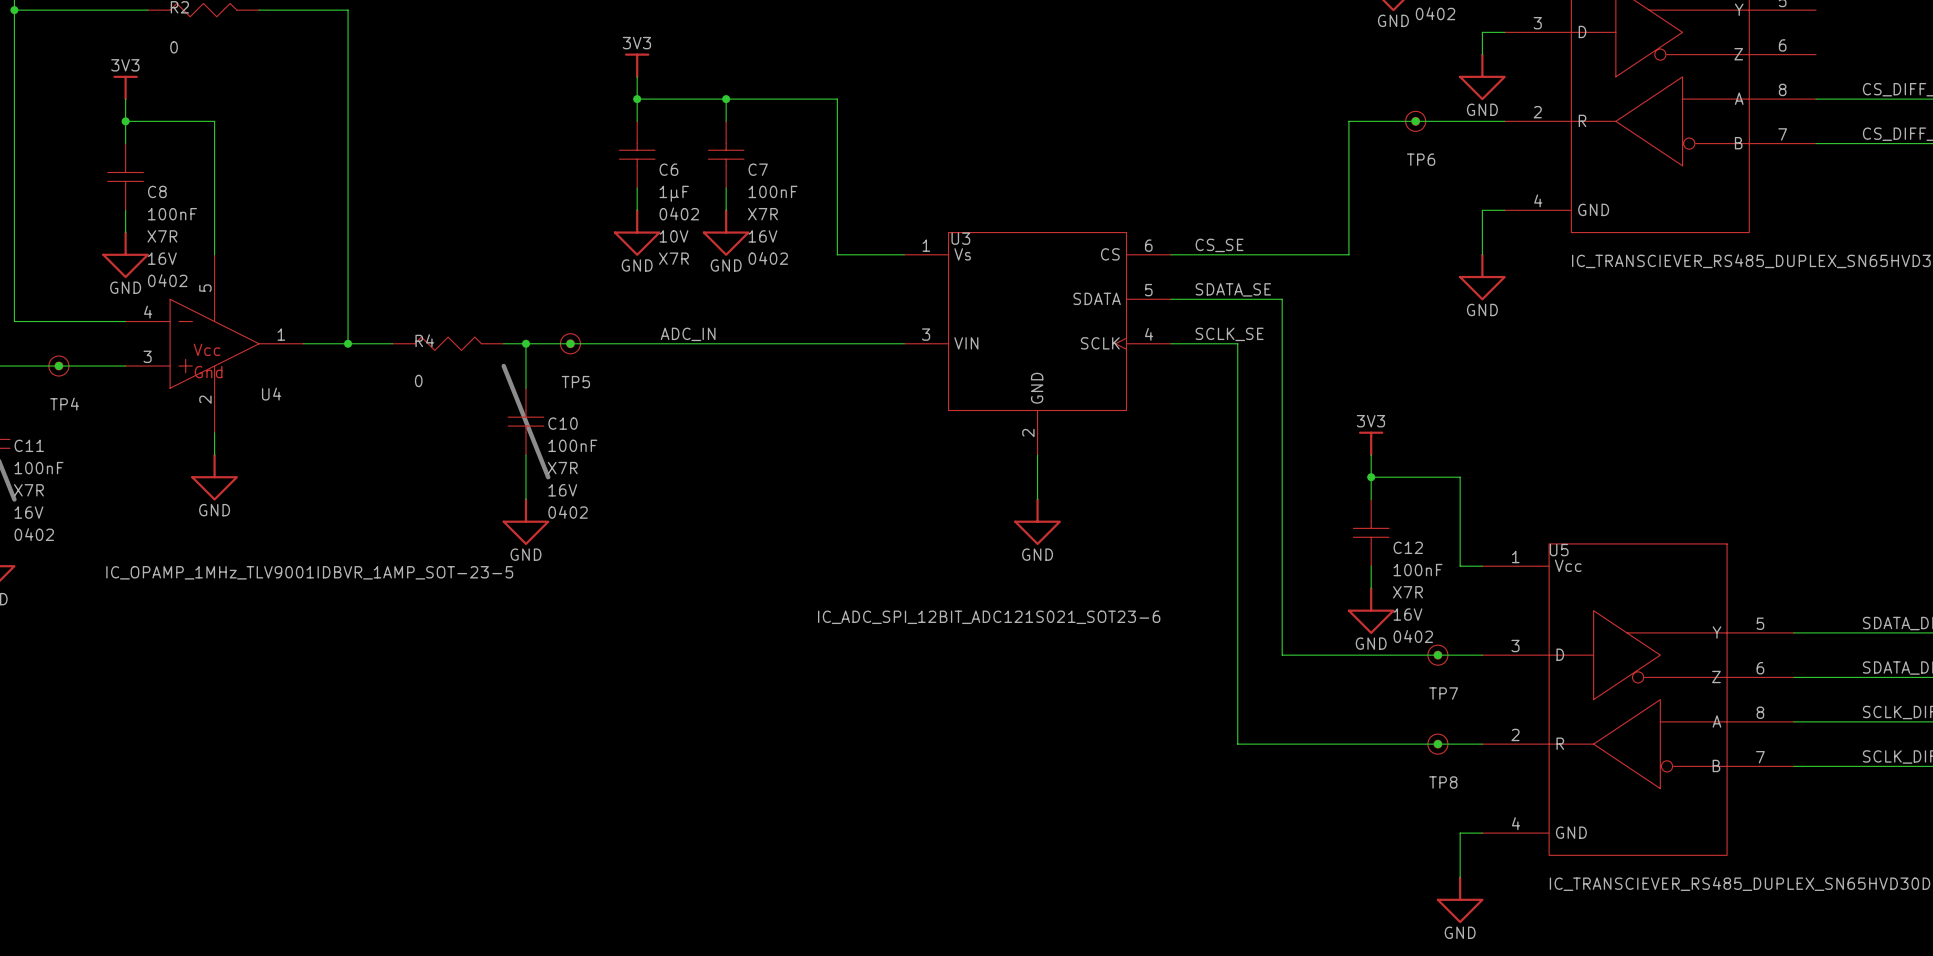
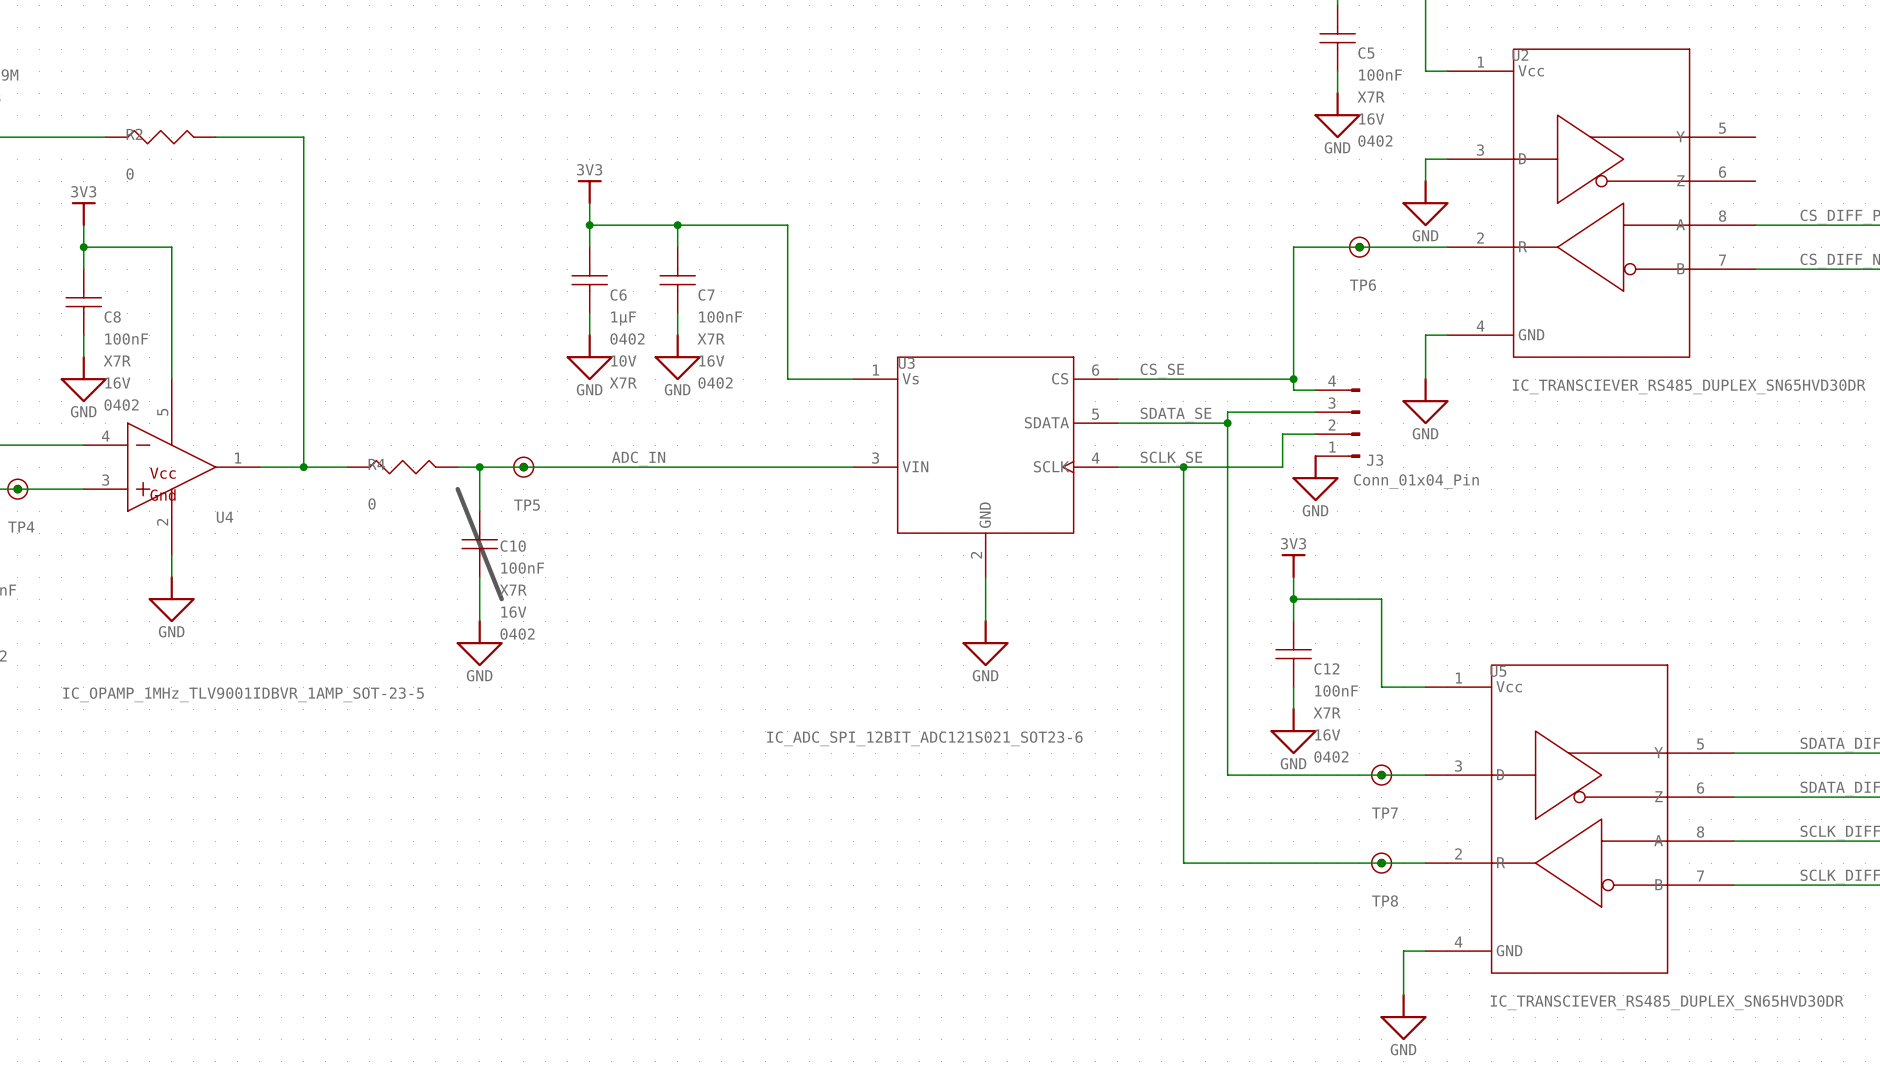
wire: none -> (1293, 379) (1293, 390) (1315, 390)
junction: none -> (1293, 379)
wire: none -> (1315, 412) (1227, 412) (1227, 423)
junction: none -> (1227, 423)
J3: none -> Conn_01x04_Pin (1337, 423)
wire: none -> (1315, 434) (1282, 434) (1282, 467) (1183, 467)
junction: none -> (1183, 467)
power symbol: none -> GND (1315, 478)
power symbol position: 3V3 (1371, 443) -> 3V3 (1293, 566)
wire: (1371, 454) (1371, 499) -> (1293, 577) (1293, 621)
wire: none -> (1293, 599) (1315, 599)
junction position: (1371, 477) -> (1293, 599)
wire: (1437, 477) (1460, 477) (1460, 566) -> (1381, 599) (1381, 687) (1403, 687)
C12 position: (1371, 532) -> (1293, 654)
wire: (1371, 566) (1371, 588) -> (1293, 687) (1293, 709)
power symbol position: GND (1371, 610) -> GND (1293, 731)

